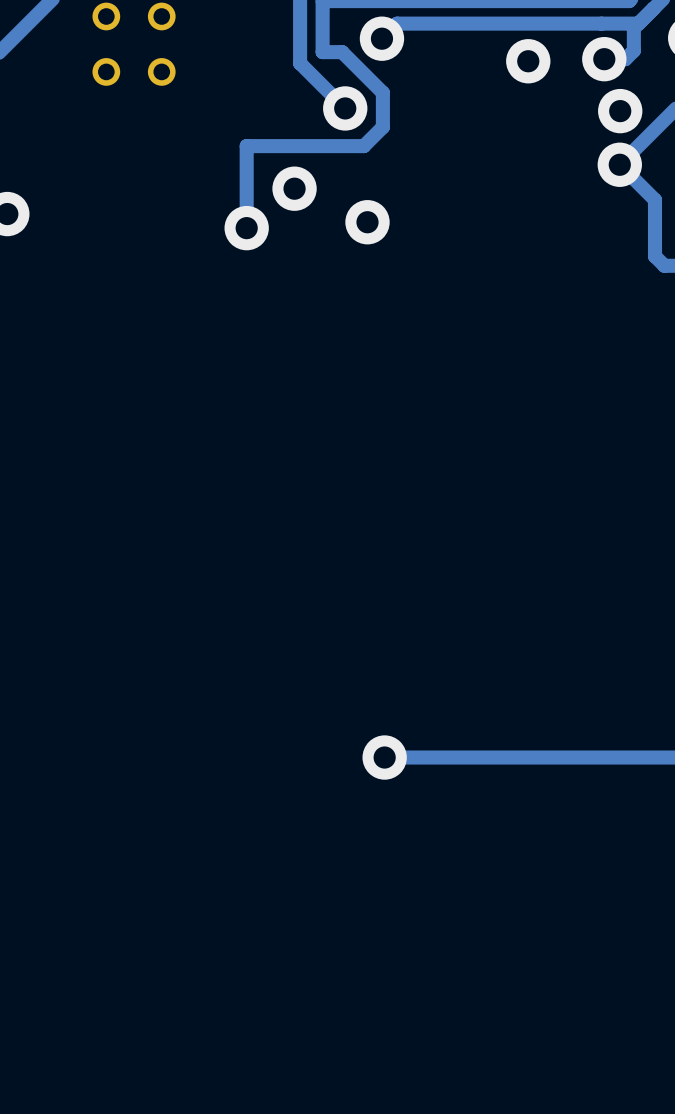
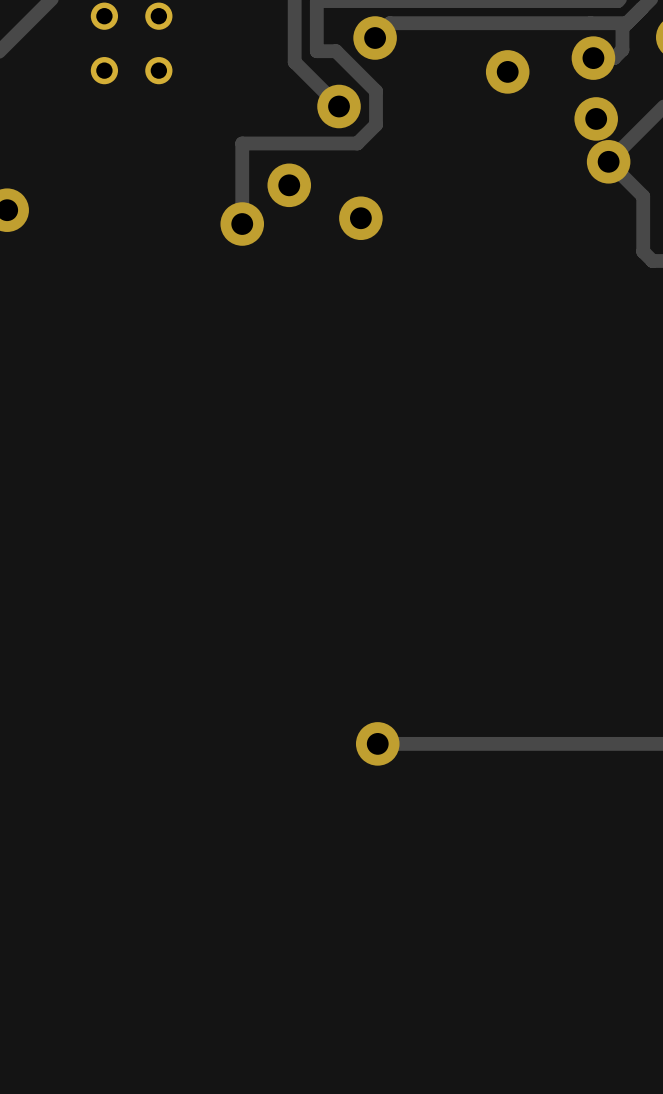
via position: (528, 61) -> (507, 71)
via position: (620, 111) -> (596, 118)

